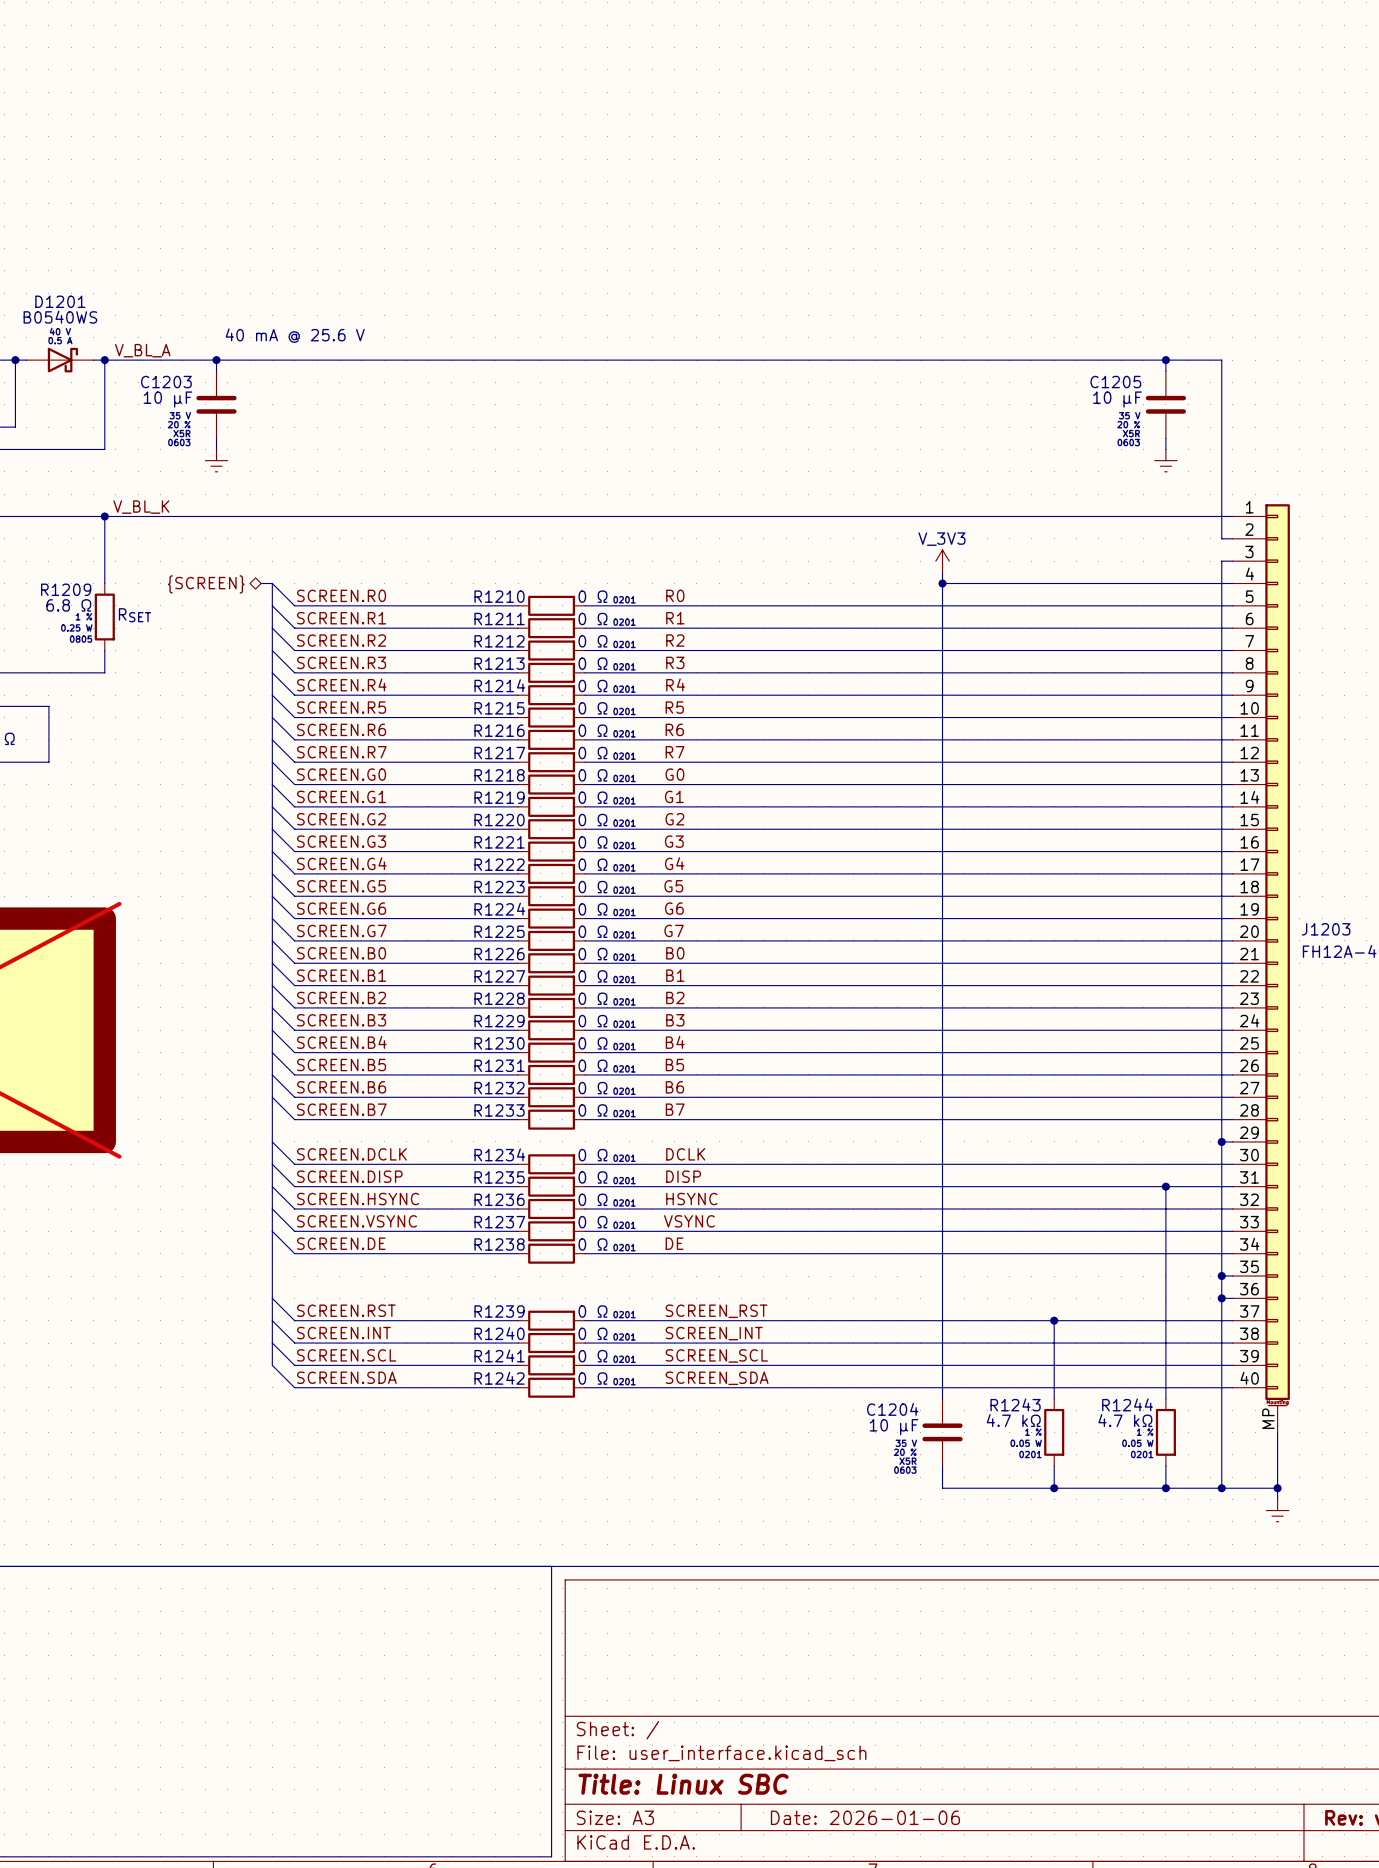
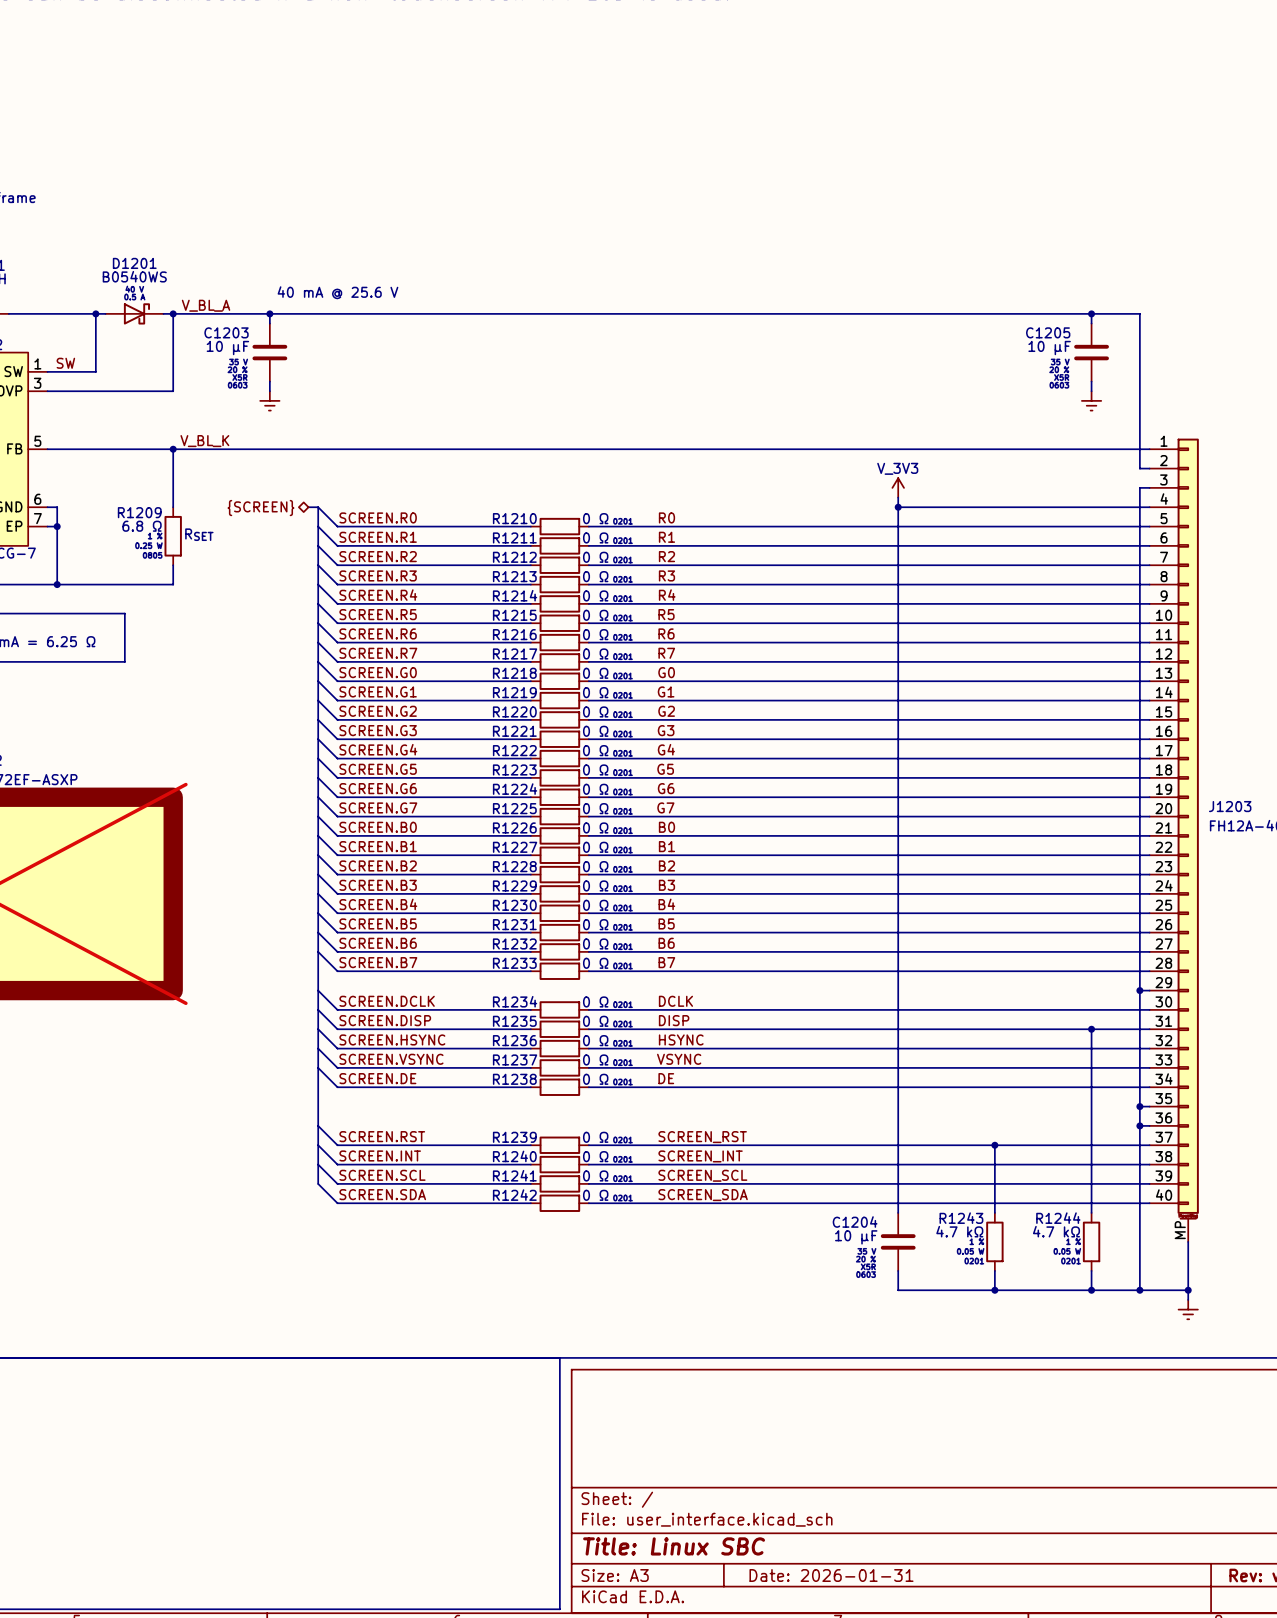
title block: Date: 2026-01-06 (865, 1817) -> Date: 2026-01-31 (831, 1575)

